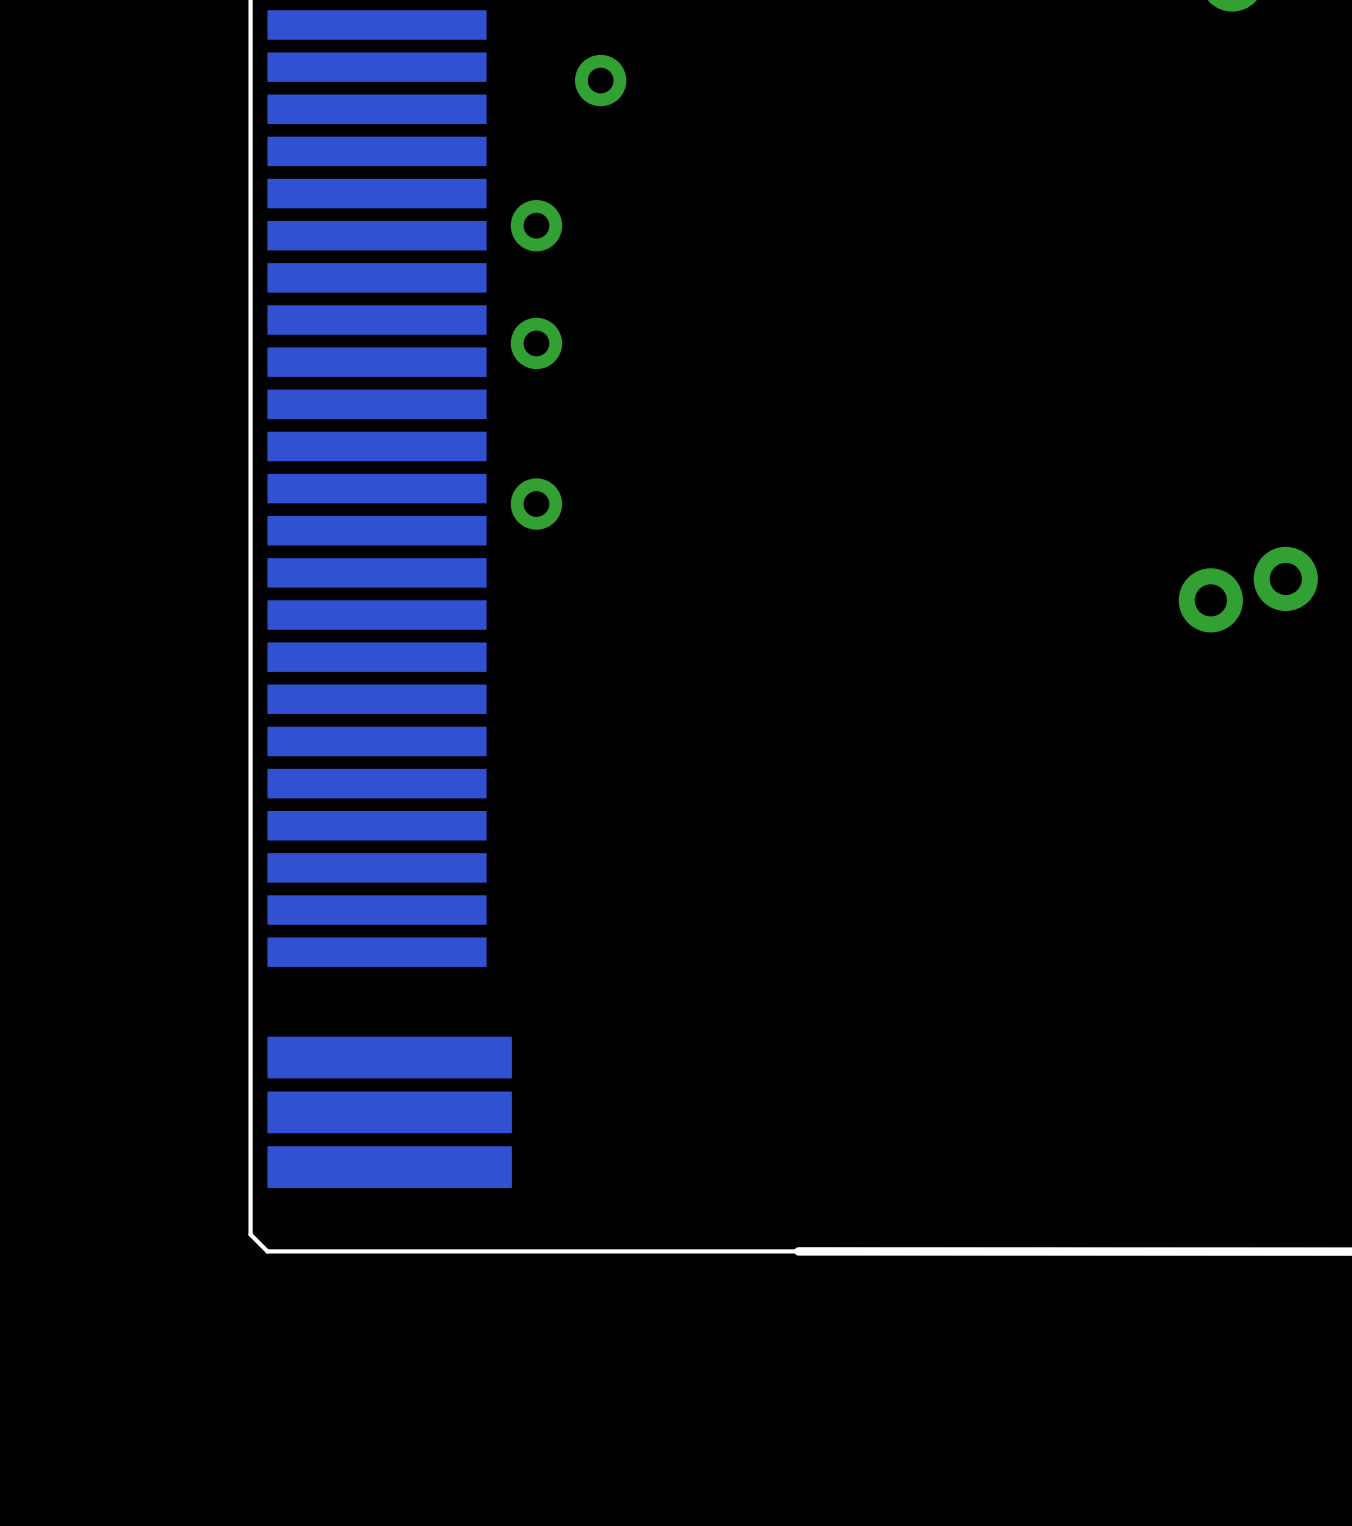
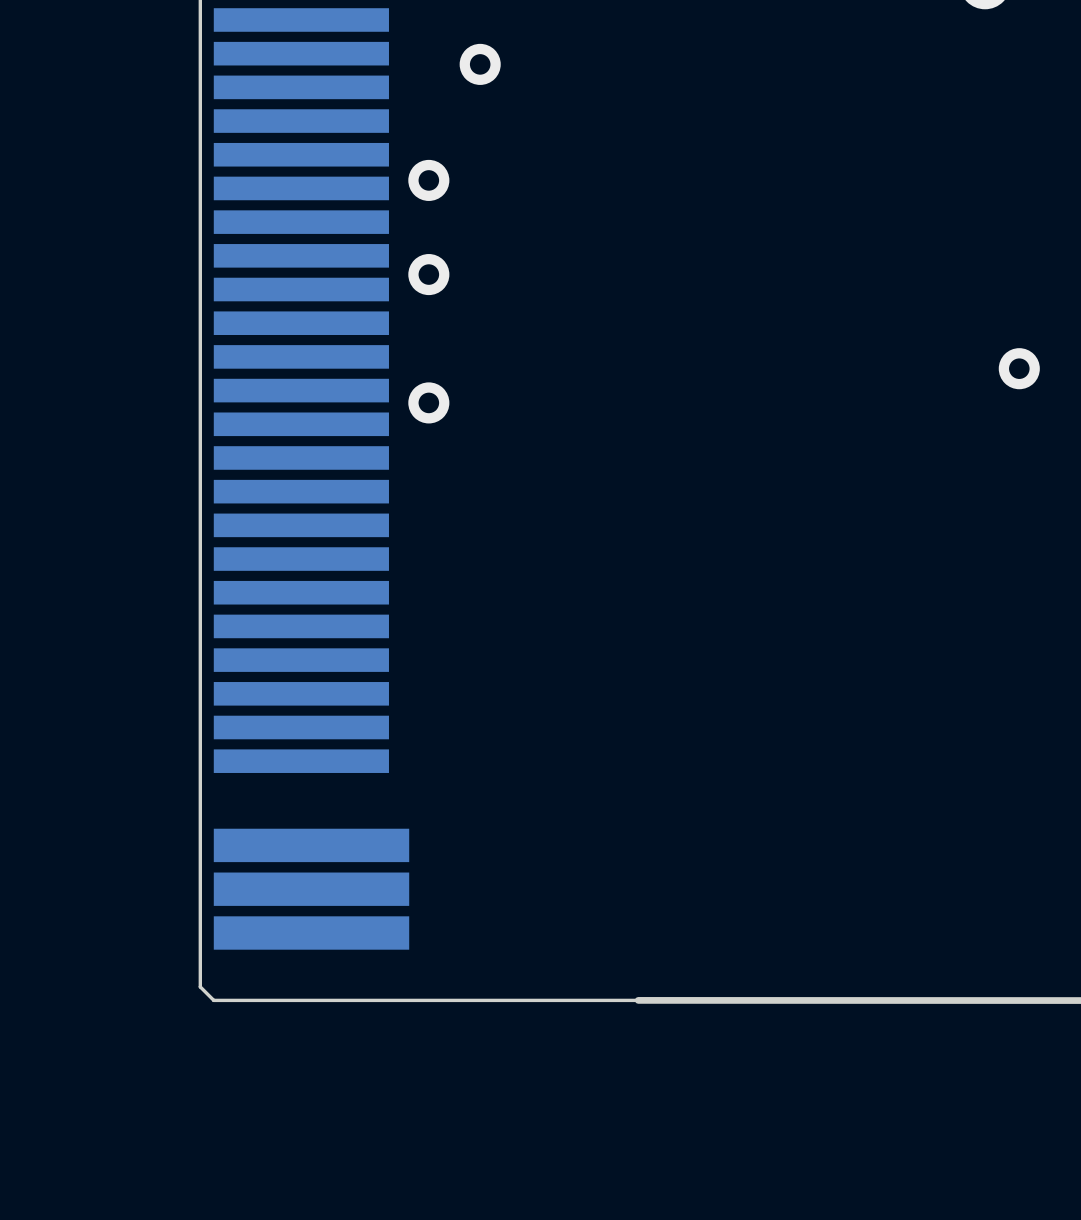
via: none -> (1019, 368)
via: (1285, 578) -> none
via: (1210, 600) -> none

